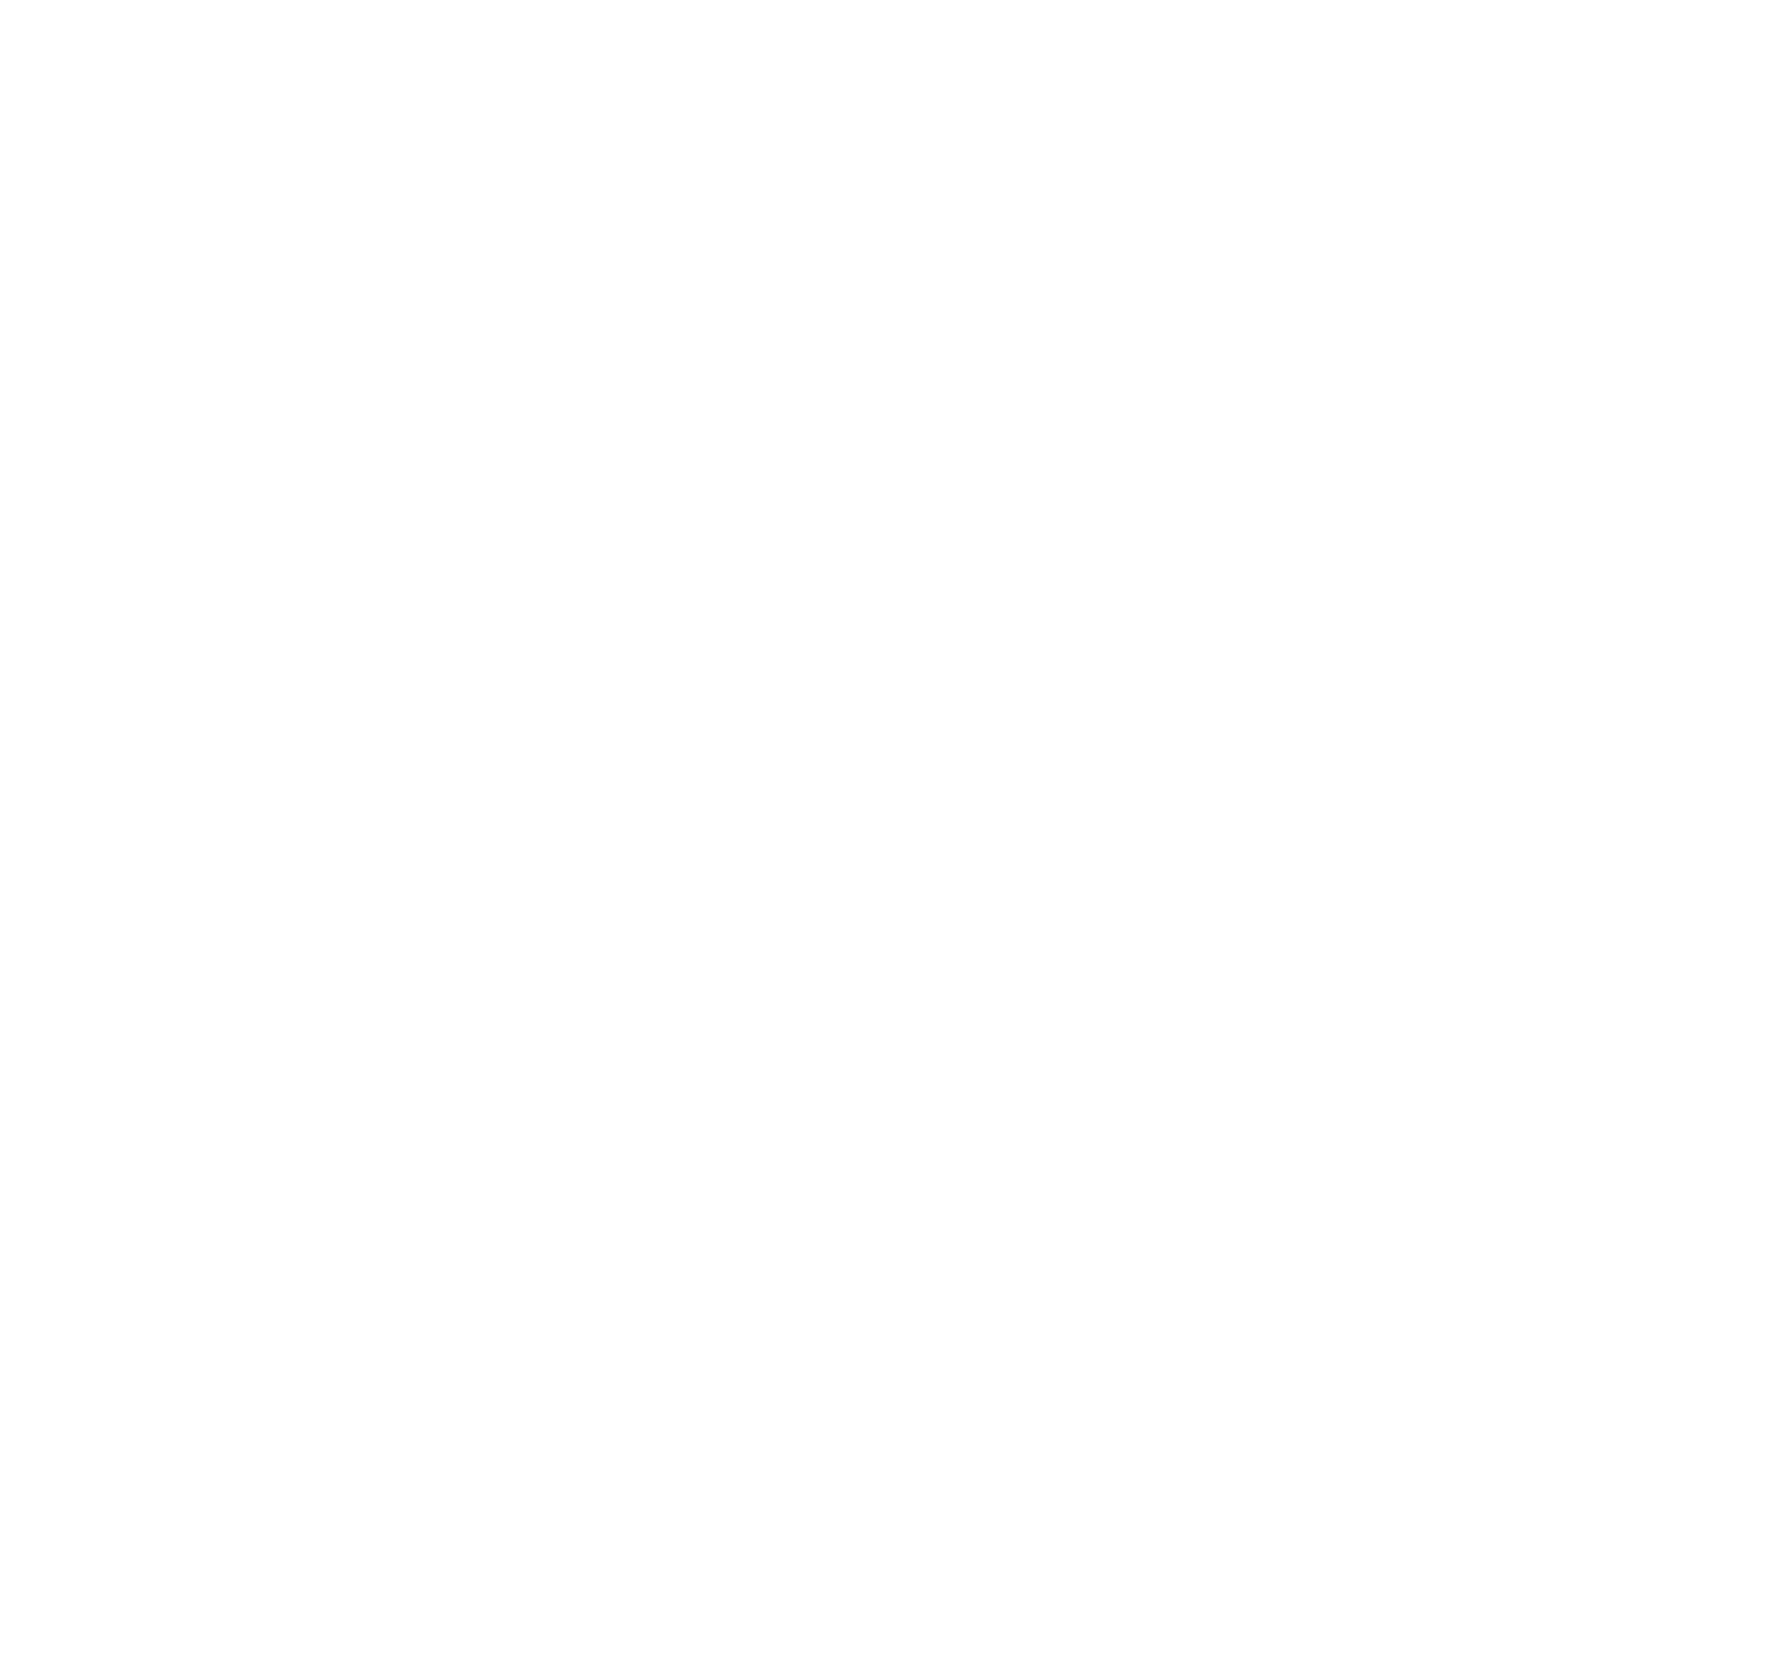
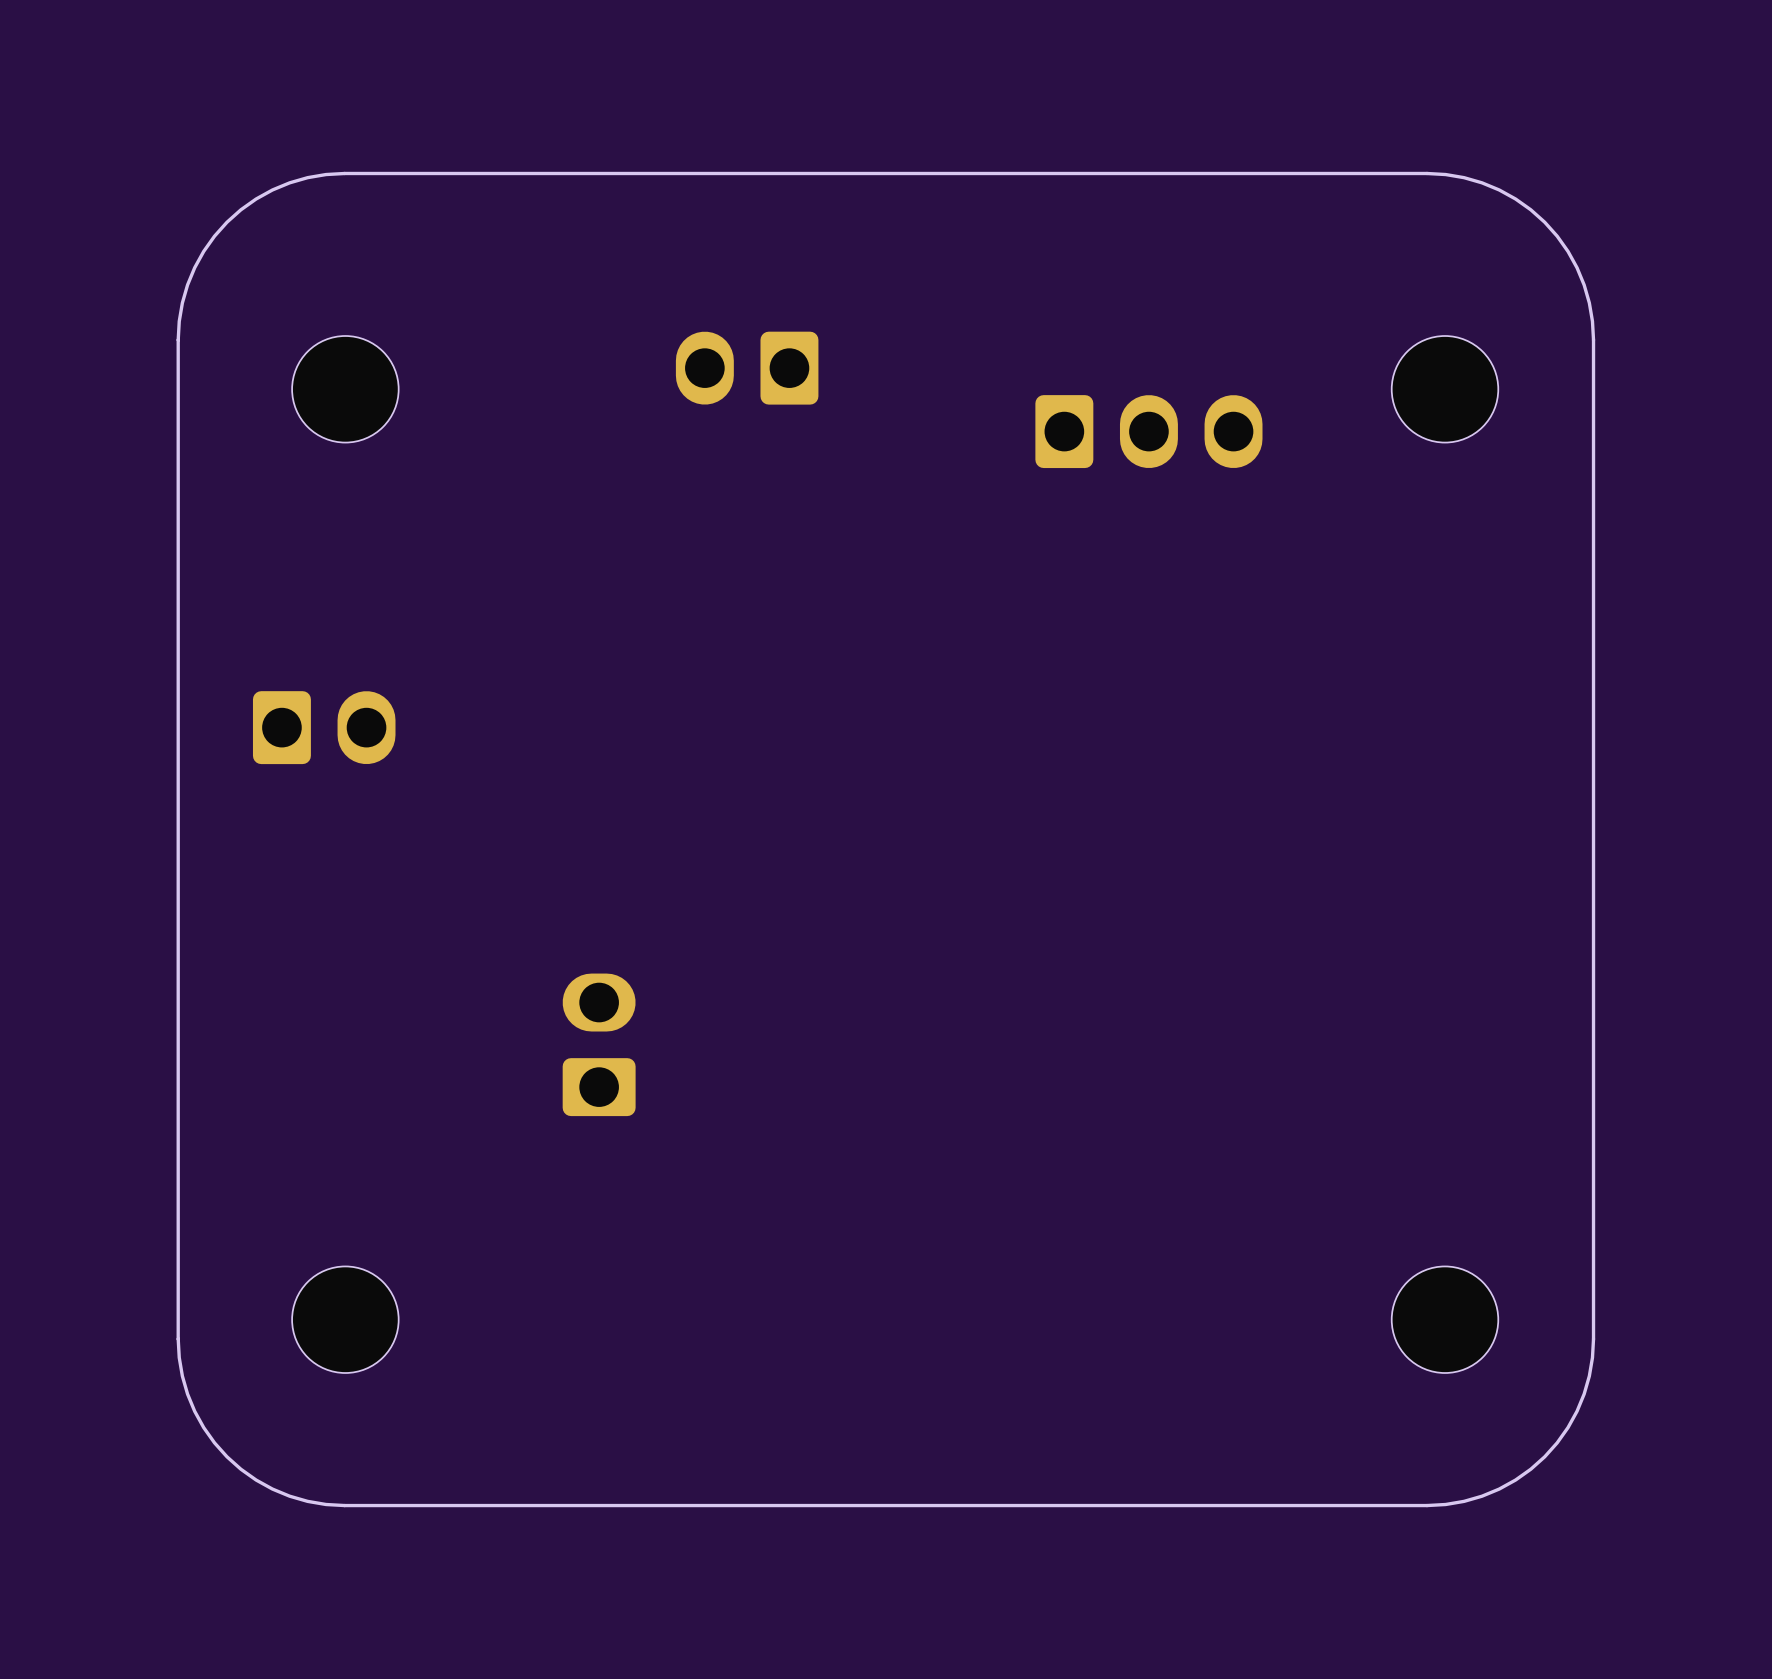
board edge: none -> (1427, 173) (344, 173) (307, 177) (272, 189) (256, 199) (226, 222) (203, 251) (187, 285) (179, 321) (178, 339) (178, 1339) (179, 1357) (187, 1394) (203, 1427) (226, 1456) (256, 1480) (272, 1489) (307, 1501) (344, 1505) (1427, 1505) (1464, 1501) (1499, 1489) (1530, 1469) (1544, 1456) (1567, 1427) (1584, 1394) (1592, 1357) (1593, 1339) (1592, 321) (1584, 285) (1577, 267) (1557, 236) (1544, 222) (1530, 209) (1499, 189) (1464, 177) (1427, 173)
part: none -> (747, 368)
part: none -> (345, 389)
part: none -> (1444, 389)
part: none -> (1148, 431)
part: none -> (324, 727)
part: none -> (599, 1044)
part: none -> (345, 1319)
part: none -> (1444, 1319)

